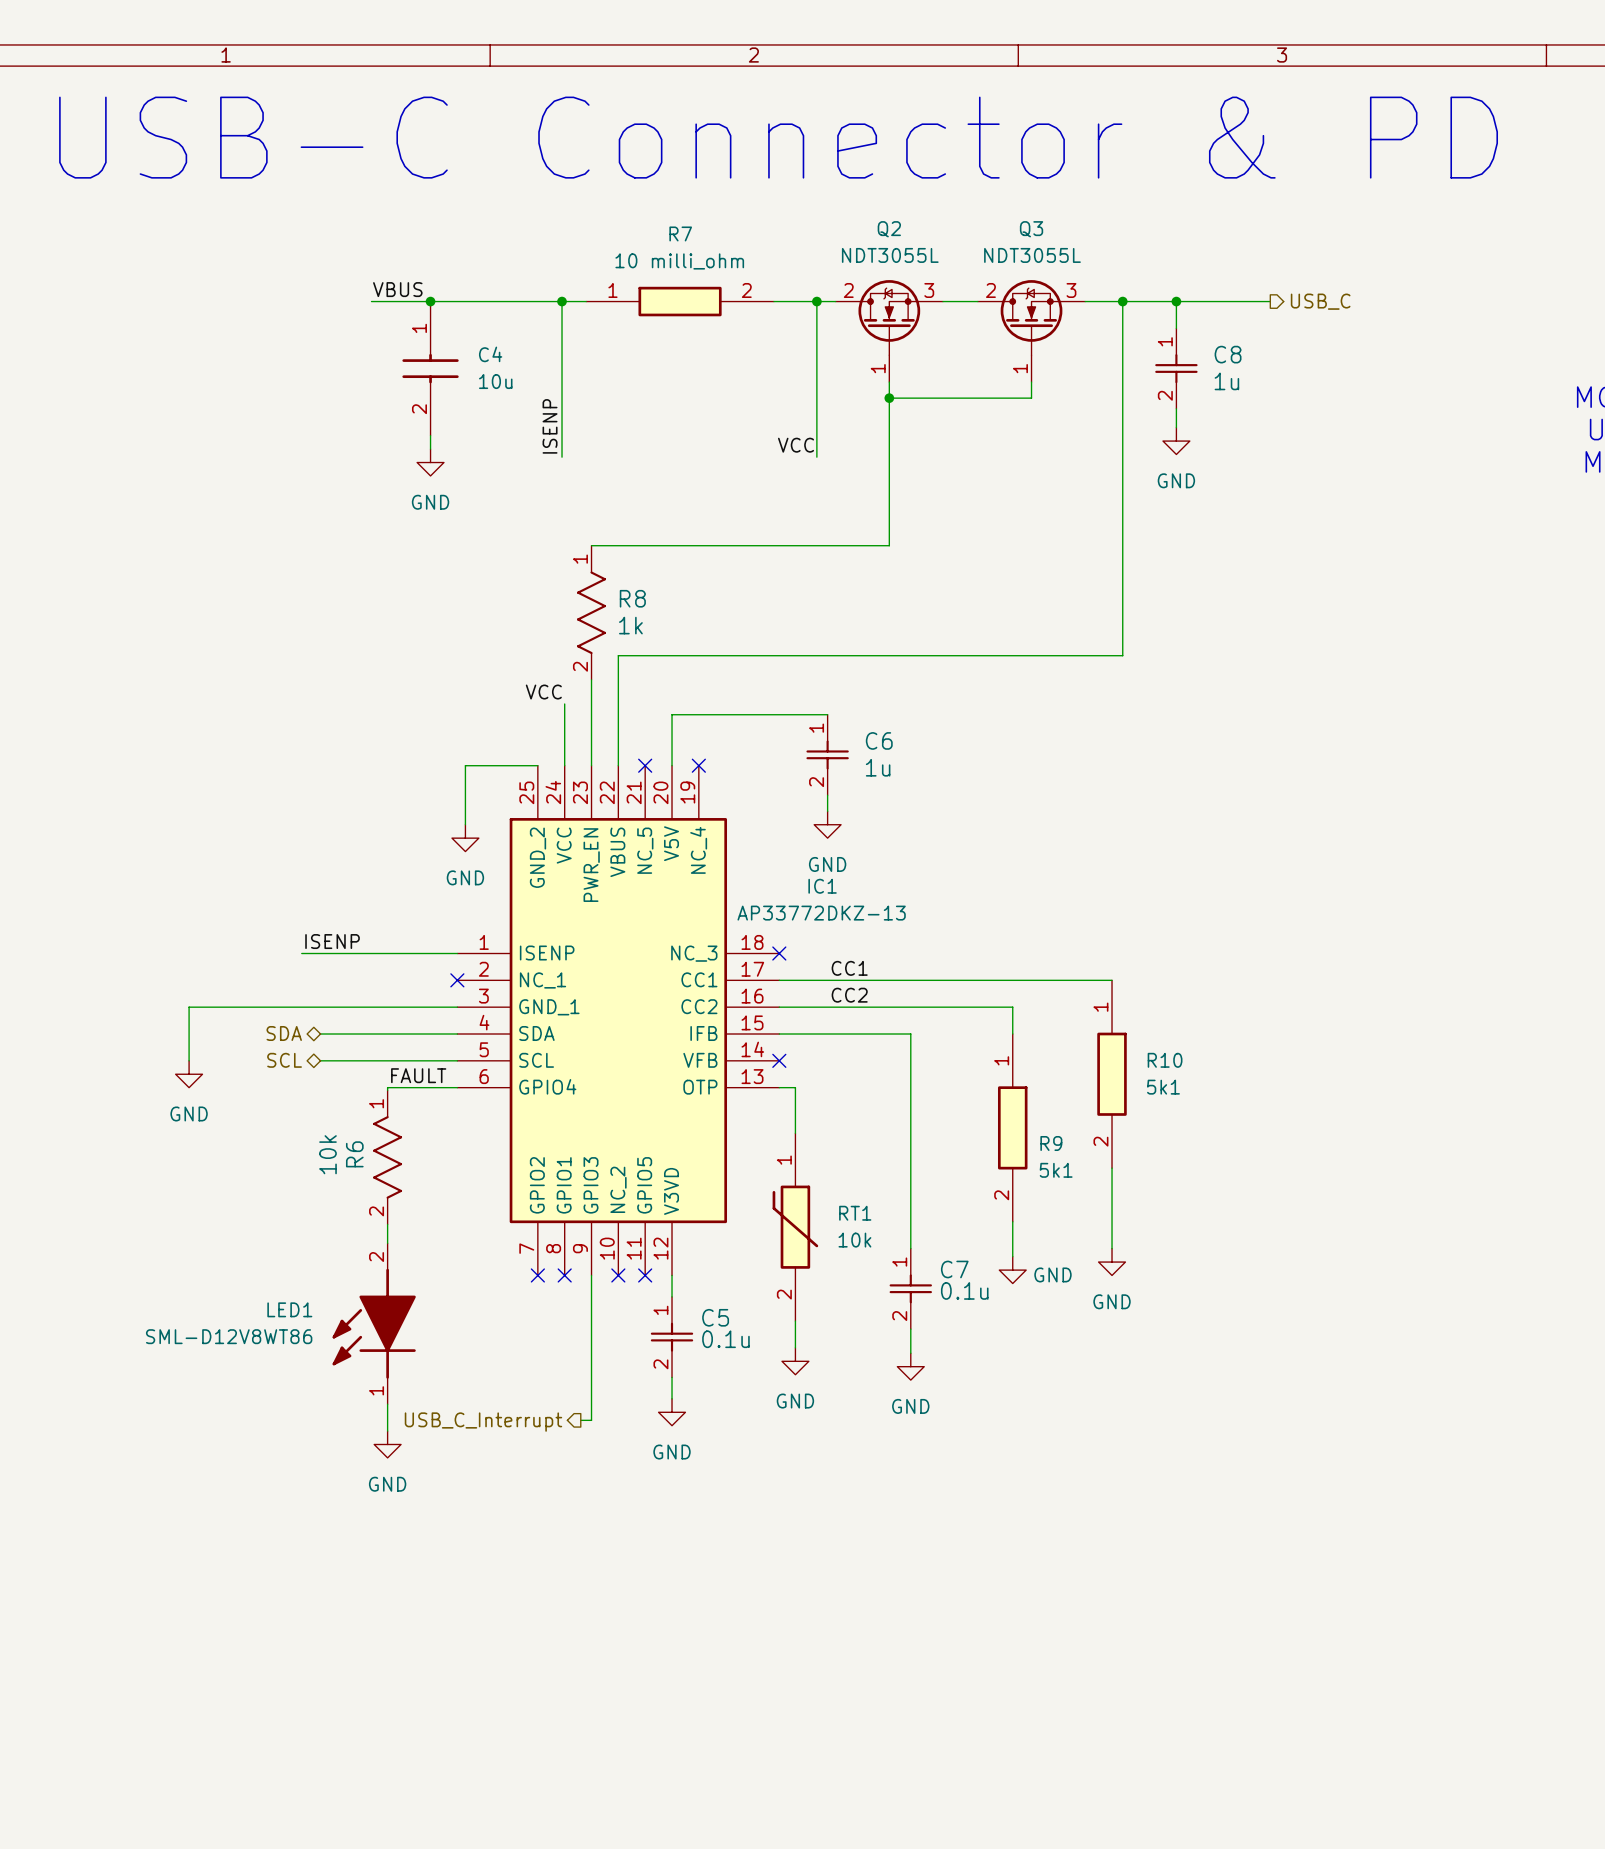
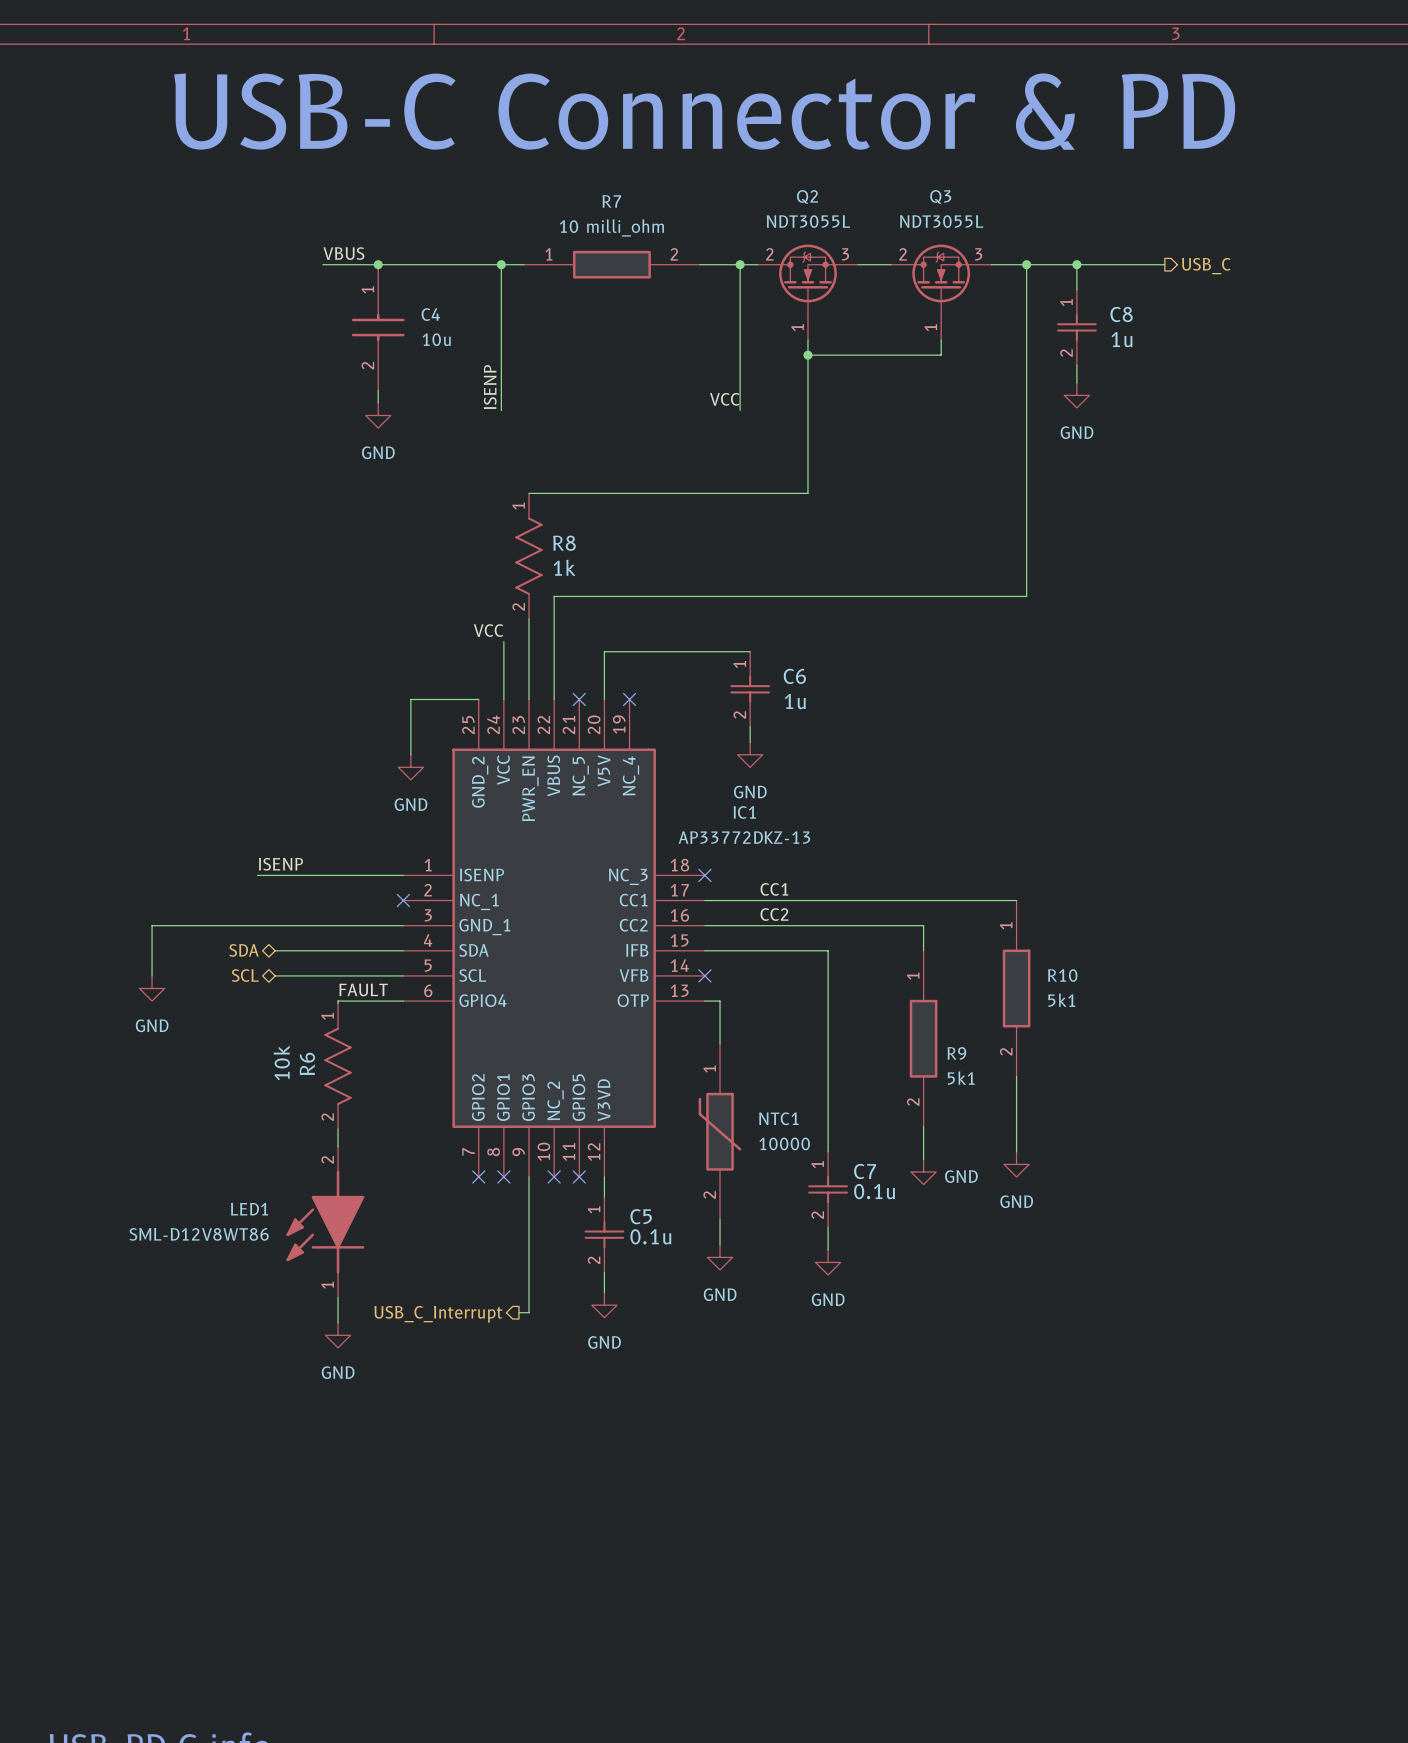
RT1 name: RT1 (855, 1213) -> NTC1 (778, 1118)
RT1 value: 10k (854, 1240) -> 10000 (784, 1143)

